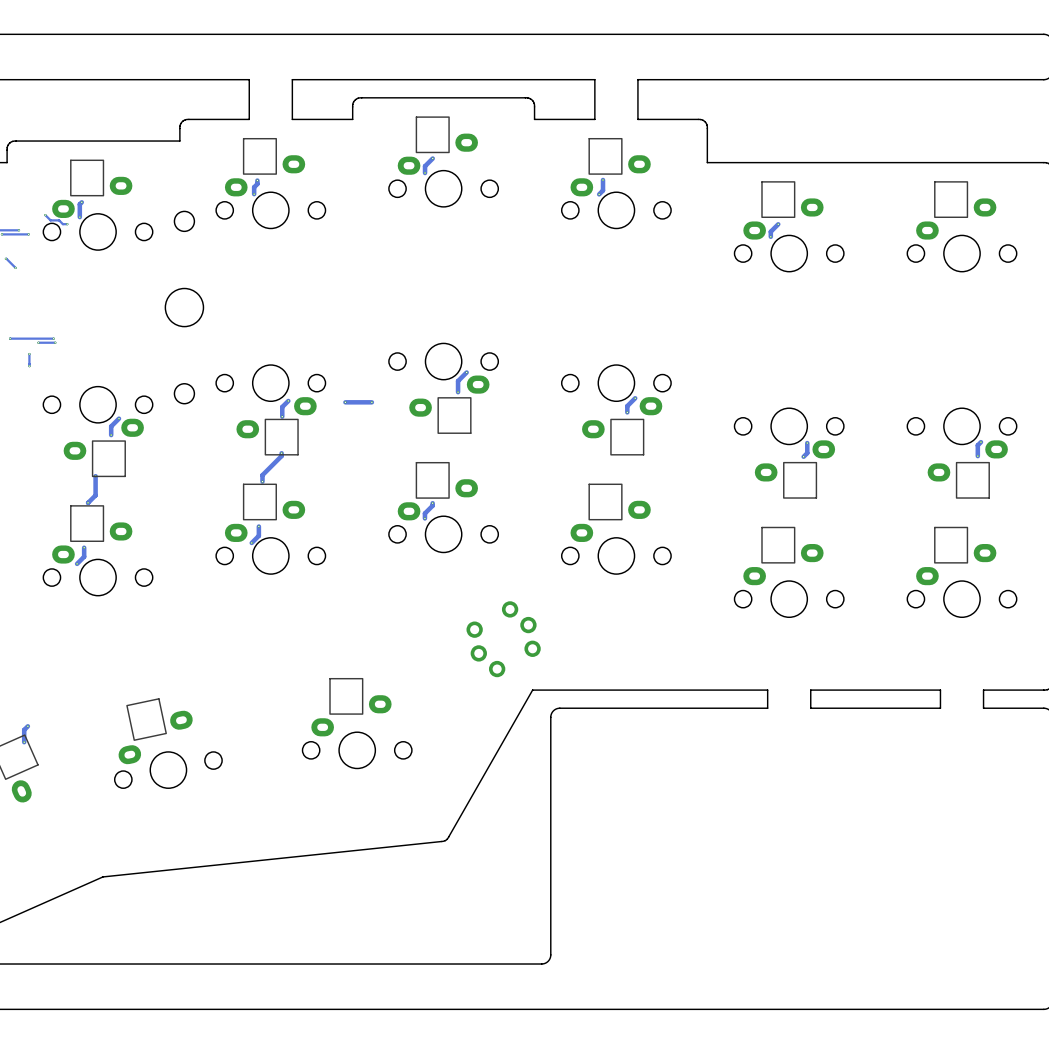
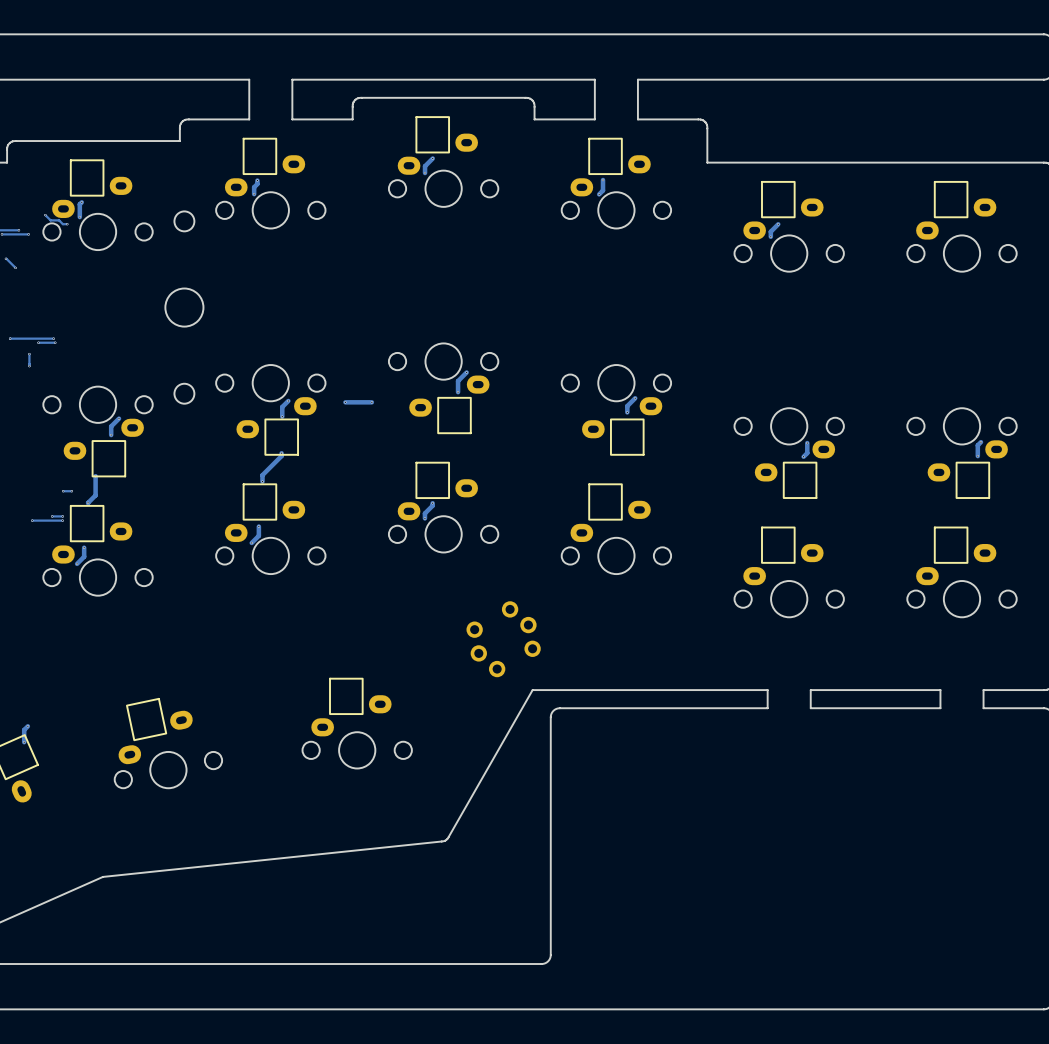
via: none -> (63, 491)
track: none -> (71, 491) (63, 491)
via: none -> (71, 491)
via: none -> (52, 516)
track: none -> (62, 516) (52, 516)
via: none -> (62, 516)
via: none -> (32, 520)
track: none -> (62, 520) (32, 520)
via: none -> (62, 520)

